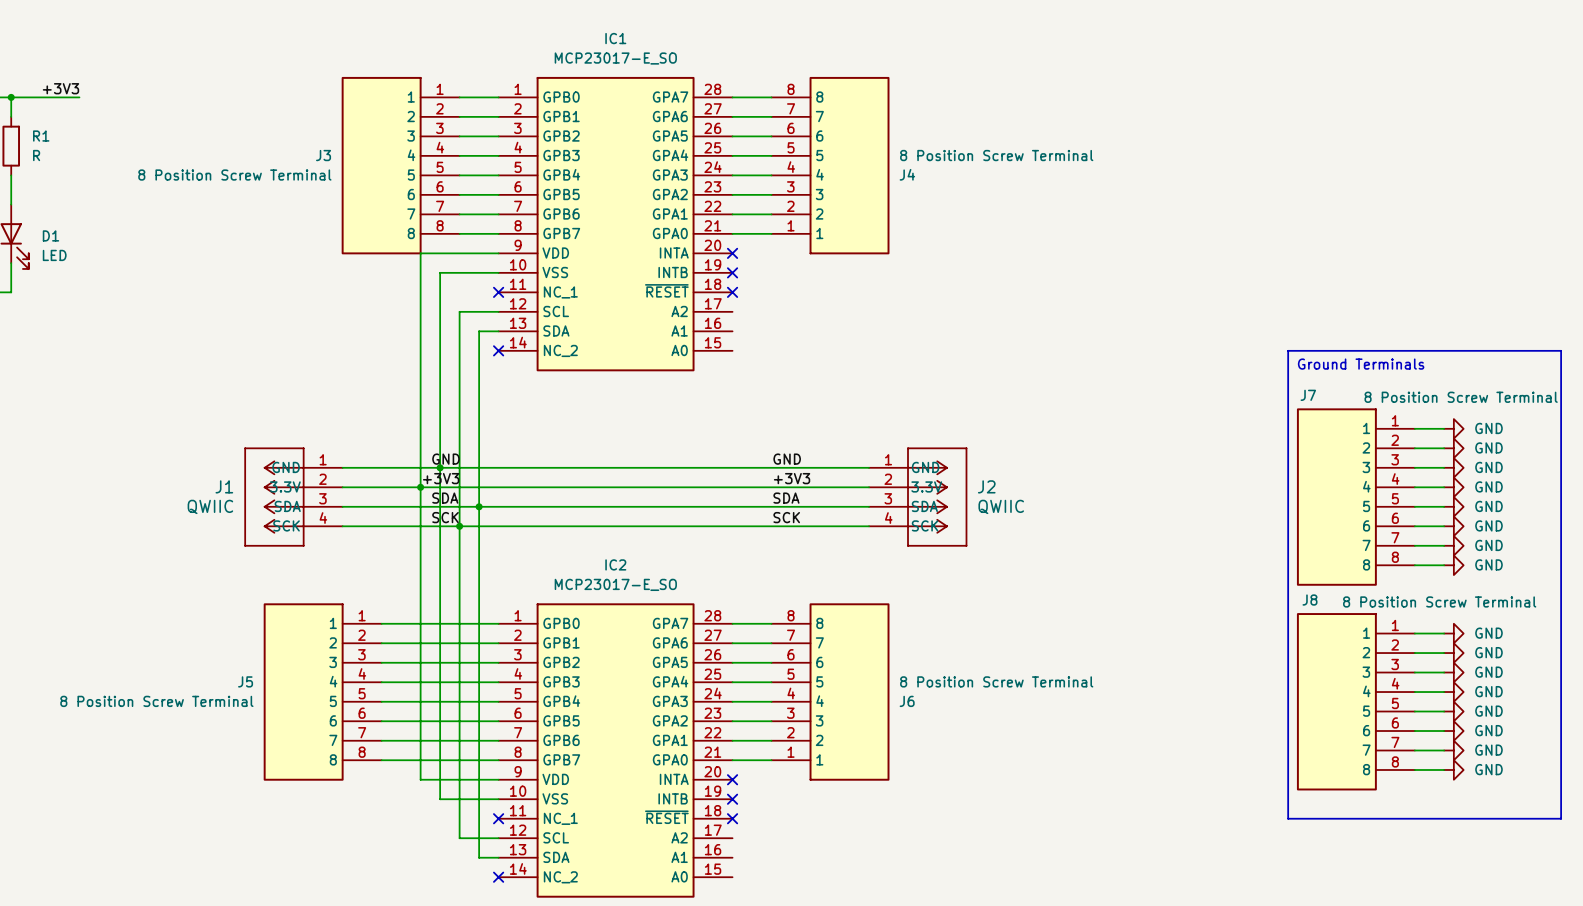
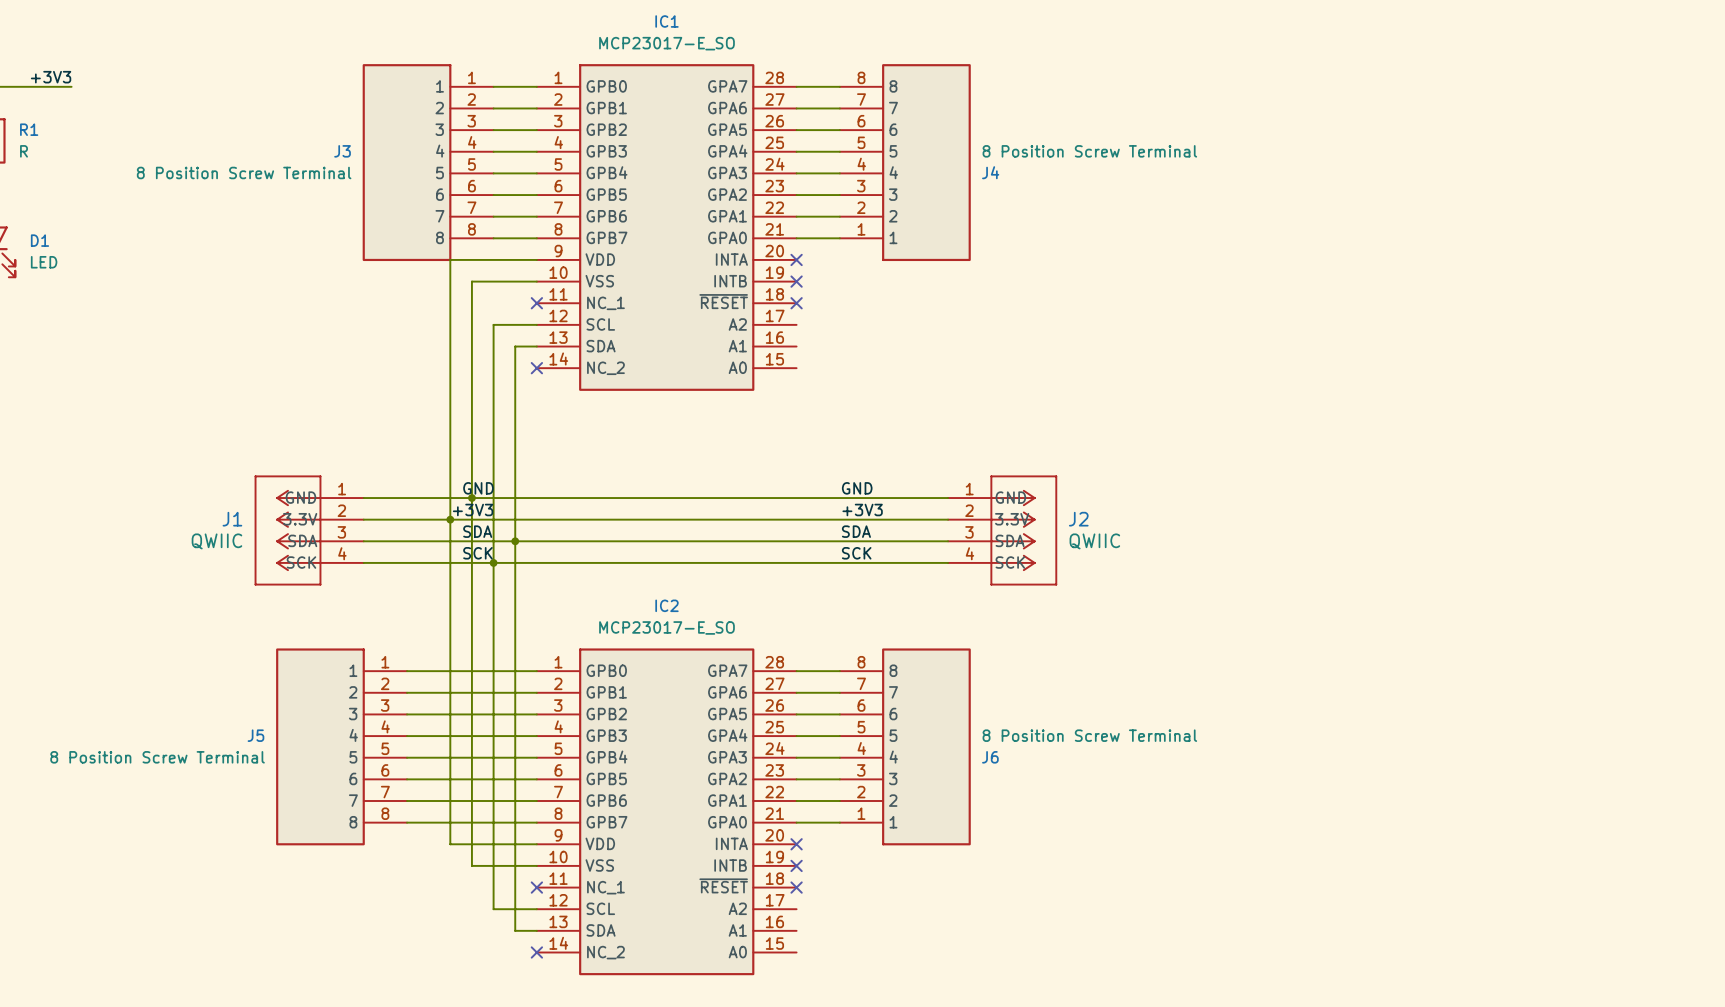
line: (1288, 350) (1561, 350) (1561, 818) (1288, 818) (1288, 350) -> none
text: Ground Terminals (1361, 364) -> none
wire: (1414, 428) (1444, 428) -> none
power symbol: GND (1453, 428) -> none
wire: (1414, 448) (1444, 448) -> none
power symbol: GND (1453, 448) -> none
wire: (1414, 467) (1444, 467) -> none
power symbol: GND (1453, 467) -> none
wire: (1414, 487) (1444, 487) -> none
power symbol: GND (1453, 487) -> none
J7: 8 Position Screw Terminal (1355, 497) -> none
wire: (1414, 506) (1444, 506) -> none
power symbol: GND (1453, 506) -> none
wire: (1414, 526) (1444, 526) -> none
power symbol: GND (1453, 526) -> none
wire: (1414, 545) (1444, 545) -> none
power symbol: GND (1453, 545) -> none
wire: (1414, 565) (1444, 565) -> none
power symbol: GND (1453, 565) -> none
wire: (1414, 633) (1444, 633) -> none
power symbol: GND (1453, 633) -> none
wire: (1414, 653) (1444, 653) -> none
power symbol: GND (1453, 653) -> none
wire: (1414, 672) (1444, 672) -> none
power symbol: GND (1453, 672) -> none
wire: (1414, 692) (1444, 692) -> none
power symbol: GND (1453, 692) -> none
J8: 8 Position Screw Terminal (1355, 701) -> none
wire: (1414, 711) (1444, 711) -> none
power symbol: GND (1453, 711) -> none
wire: (1414, 731) (1444, 731) -> none
power symbol: GND (1453, 731) -> none
wire: (1414, 750) (1444, 750) -> none
power symbol: GND (1453, 750) -> none
wire: (1414, 769) (1444, 769) -> none
power symbol: GND (1453, 769) -> none

